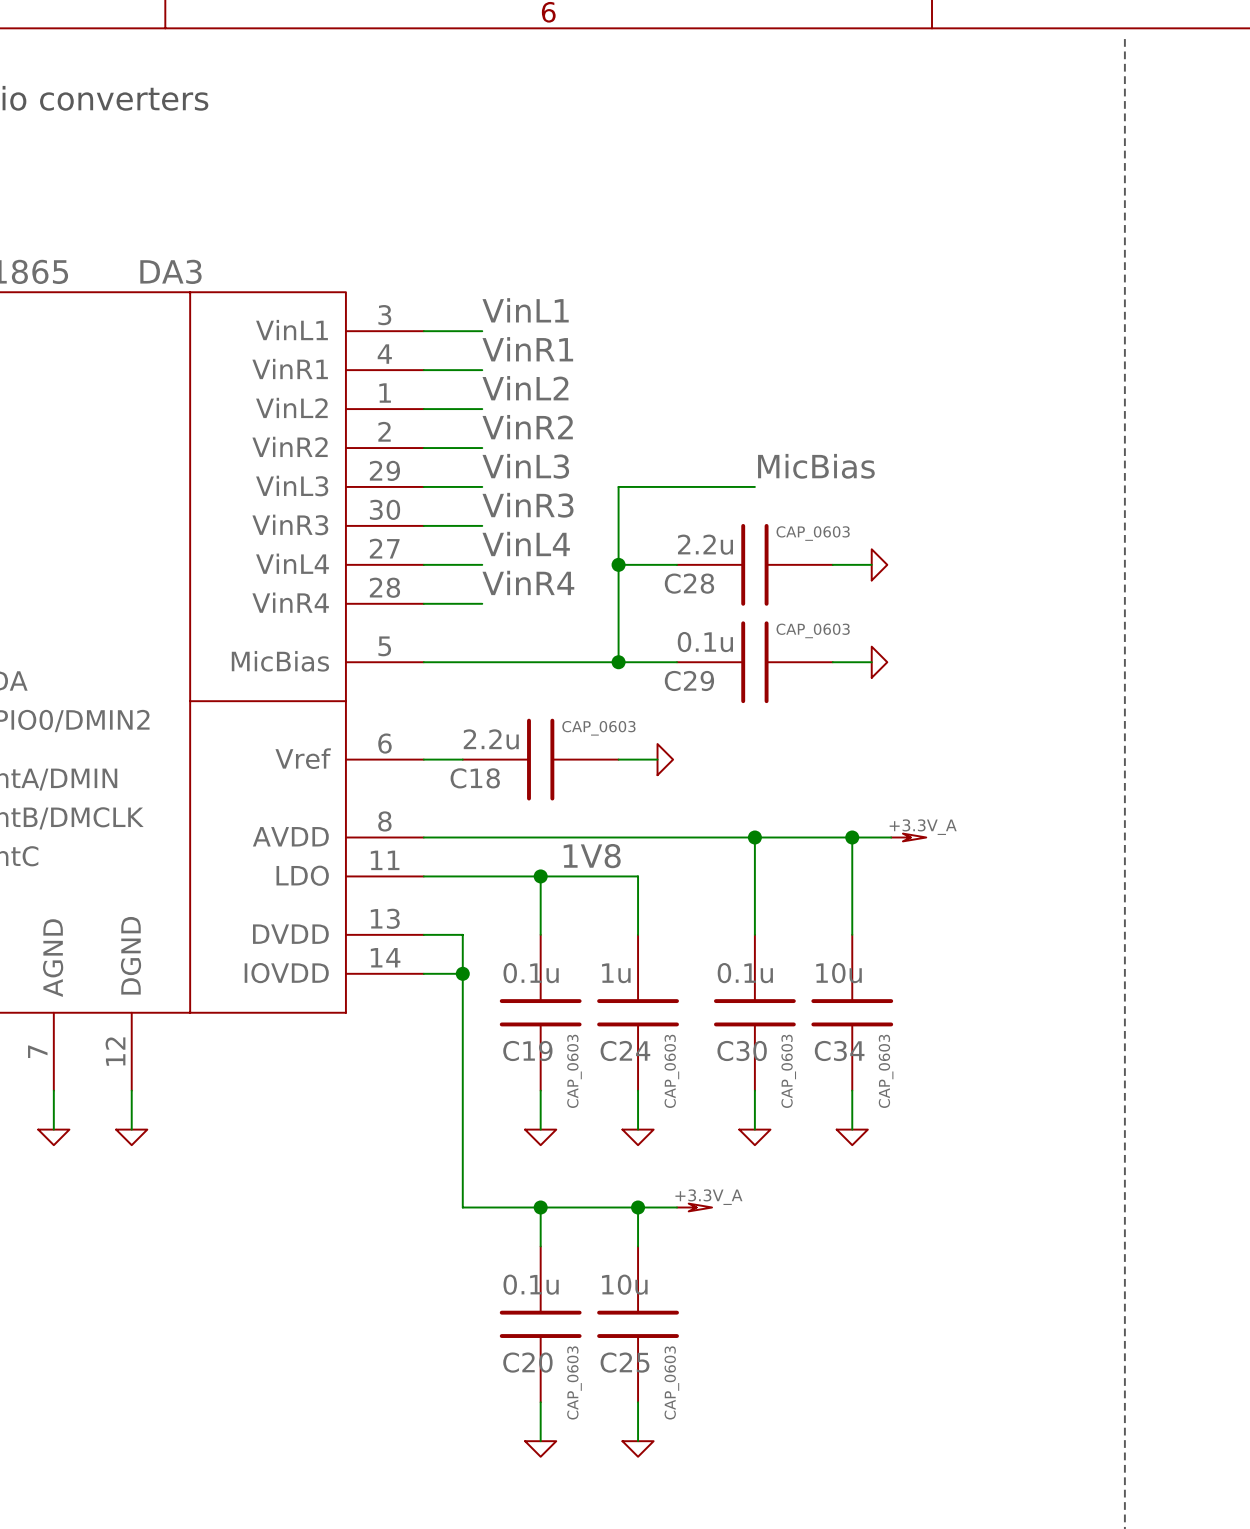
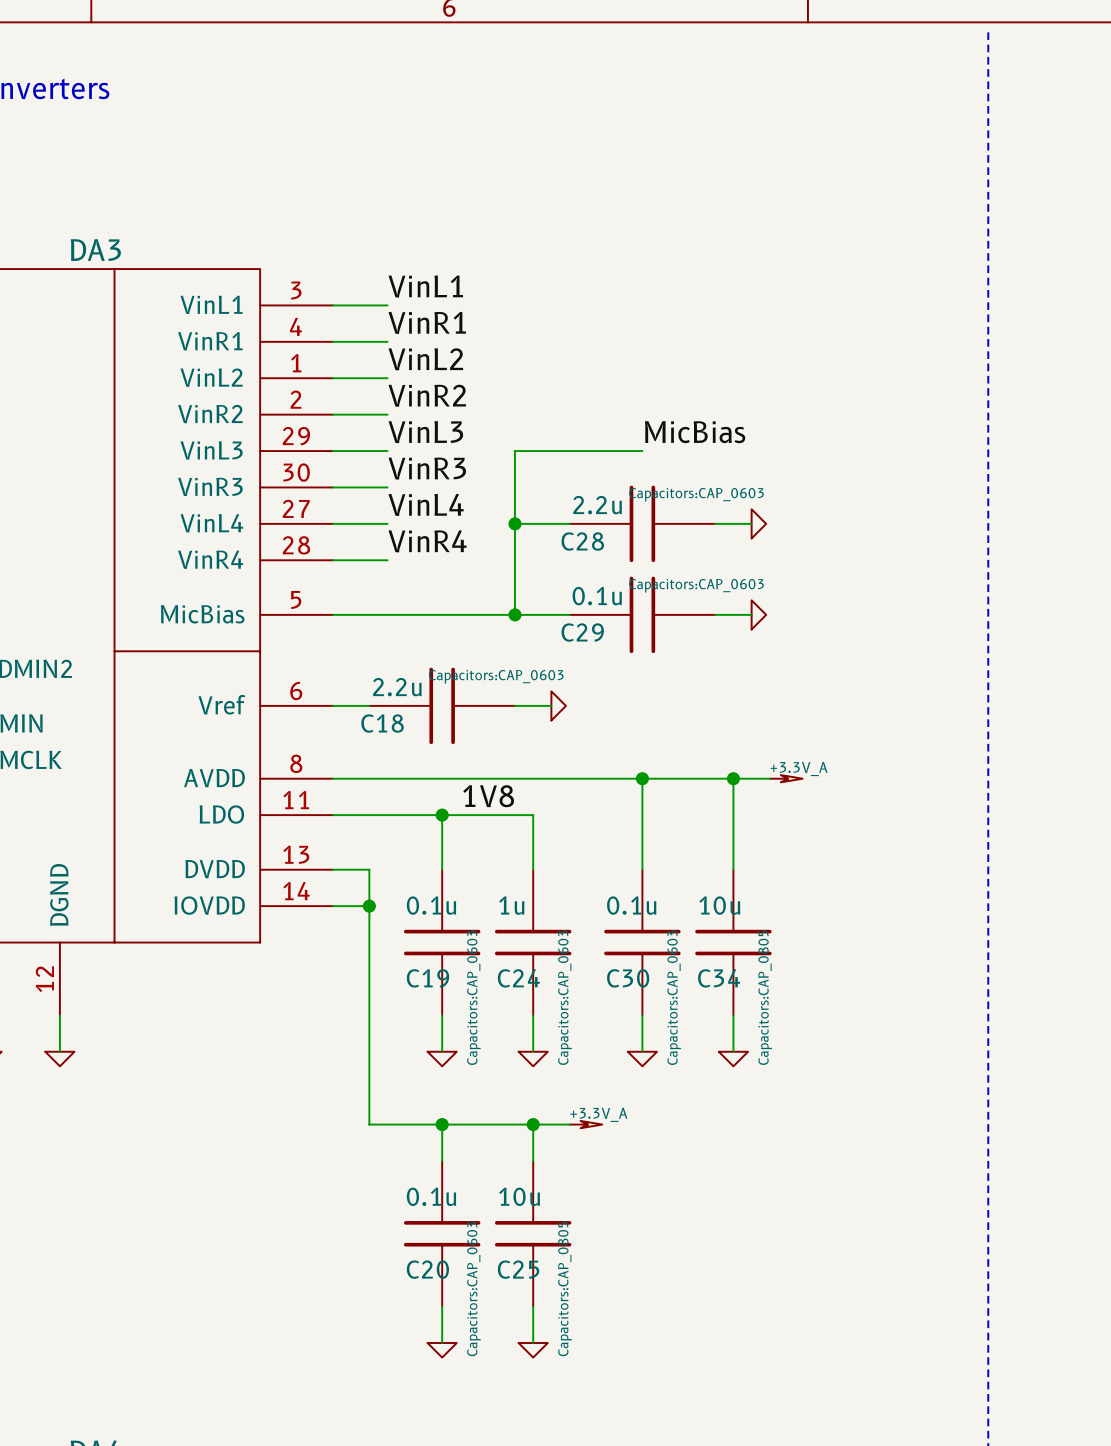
C28 text: CAP_0603 (813, 533) -> Capacitors:CAP_0603 (696, 494)
C29 text: CAP_0603 (813, 630) -> Capacitors:CAP_0603 (696, 585)
C18 text: CAP_0603 (598, 728) -> Capacitors:CAP_0603 (496, 676)
C19 text: CAP_0603 (574, 1071) -> Capacitors:CAP_0603 (473, 997)
C24 text: CAP_0603 (671, 1071) -> Capacitors:CAP_0603 (564, 997)
C30 text: CAP_0603 (788, 1071) -> Capacitors:CAP_0603 (674, 997)
C34 text: CAP_0603 (886, 1071) -> Capacitors:CAP_0805 (765, 997)
C20 text: CAP_0603 (574, 1382) -> Capacitors:CAP_0603 (473, 1288)
C25 text: CAP_0603 (671, 1382) -> Capacitors:CAP_0805 (564, 1288)

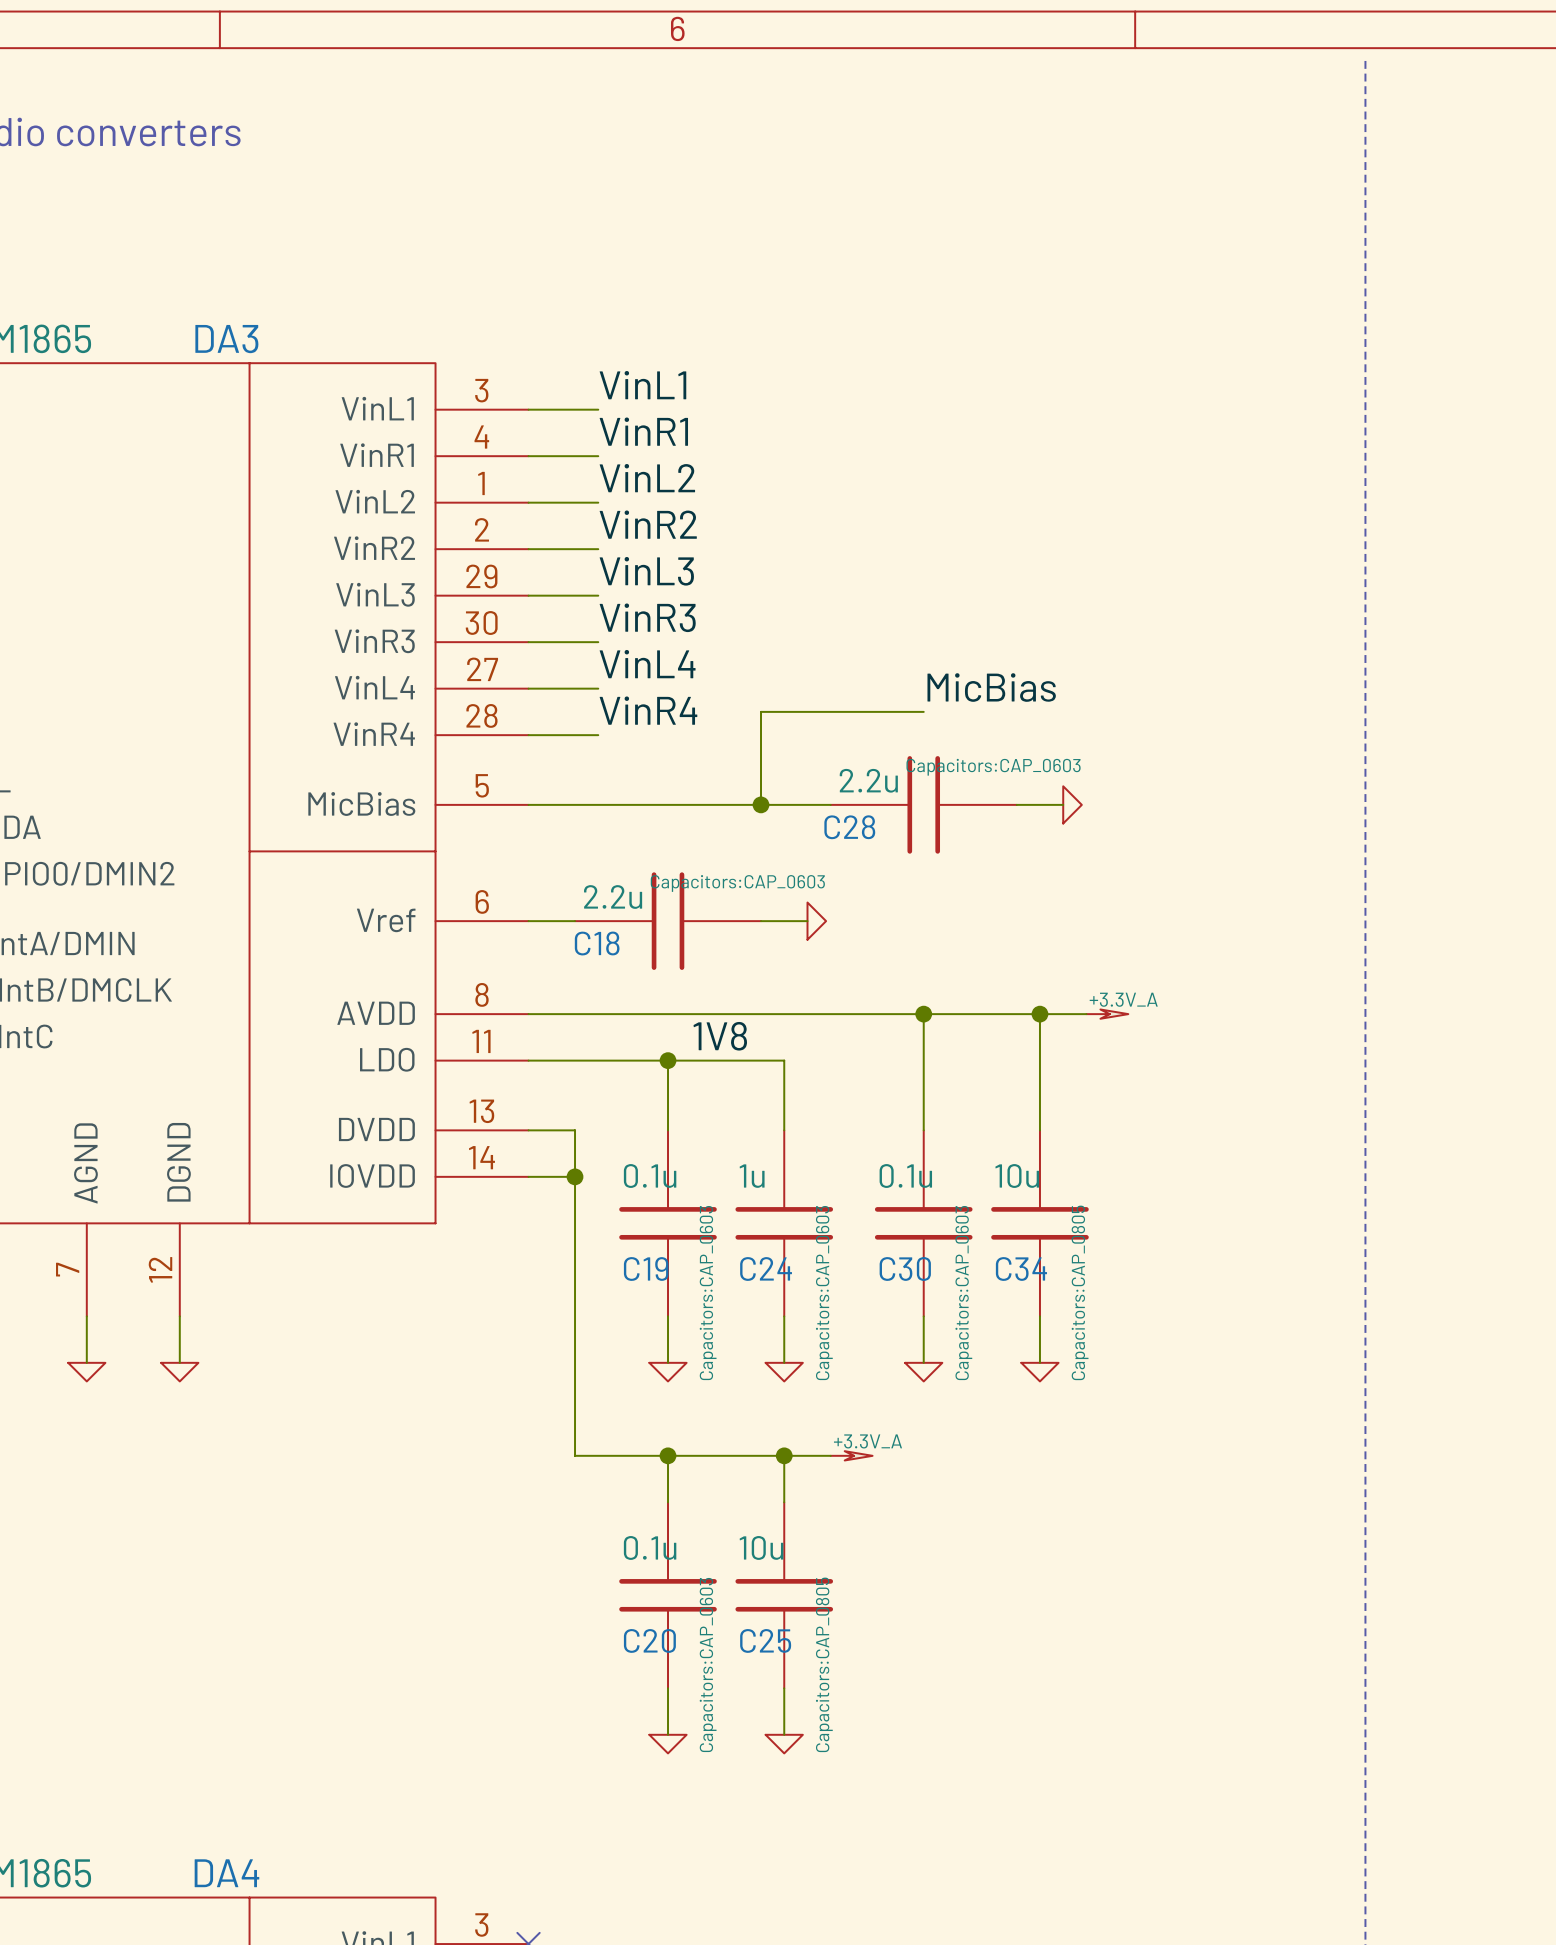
label position: MicBias (695, 432) -> MicBias (991, 687)
wire: (642, 451) (514, 451) (514, 542) -> (923, 711) (761, 711)
wire: (514, 523) (569, 523) -> none
junction: (514, 523) -> none
C28: 2.2u (642, 523) -> none
wire: (715, 523) (751, 523) -> none
power symbol: (758, 523) -> none
C29 value: 0.1u (597, 596) -> 2.2u (868, 780)
C29 name: C29 (582, 632) -> C28 (849, 827)

